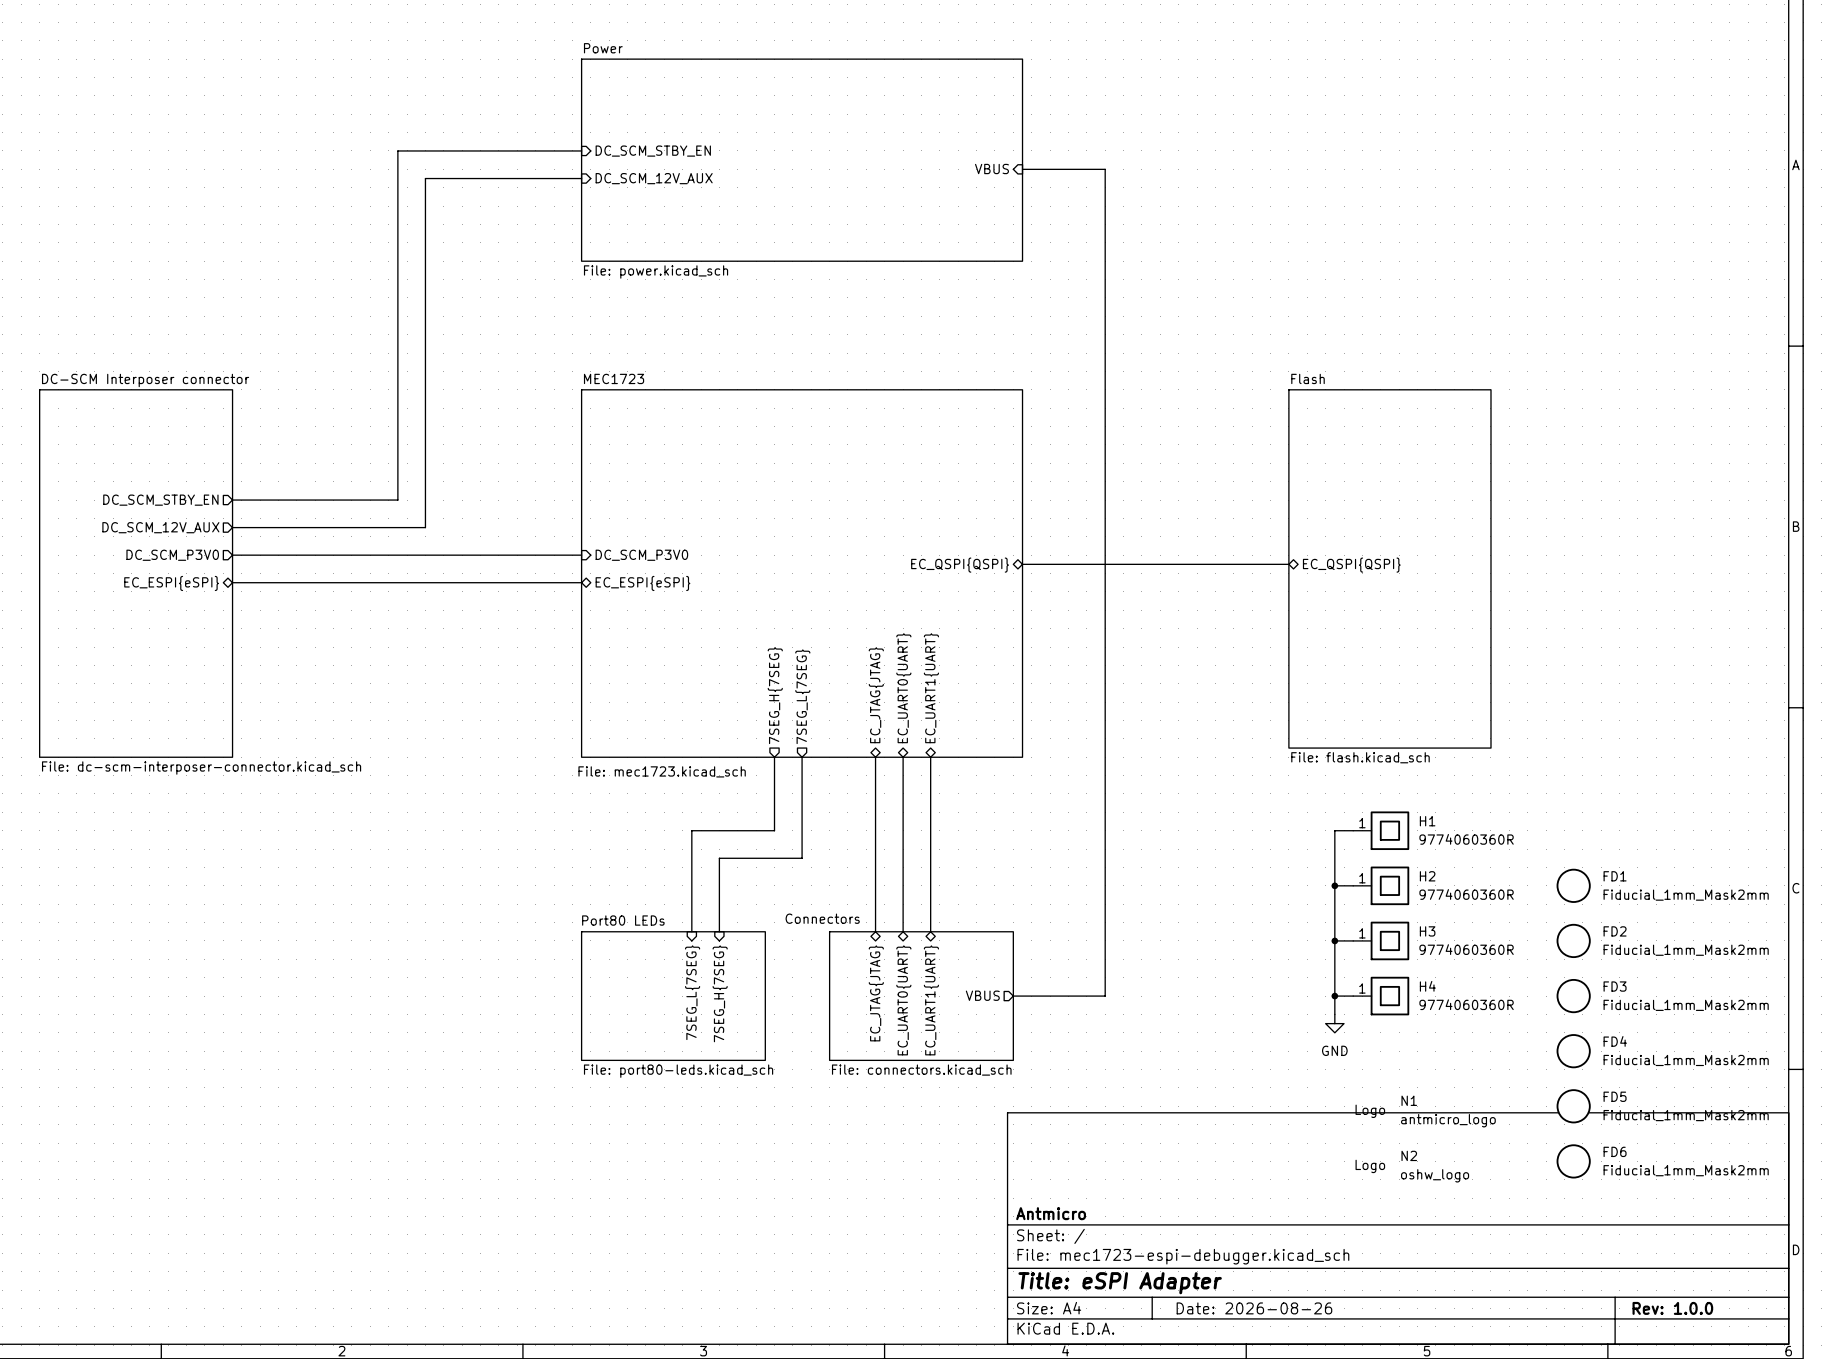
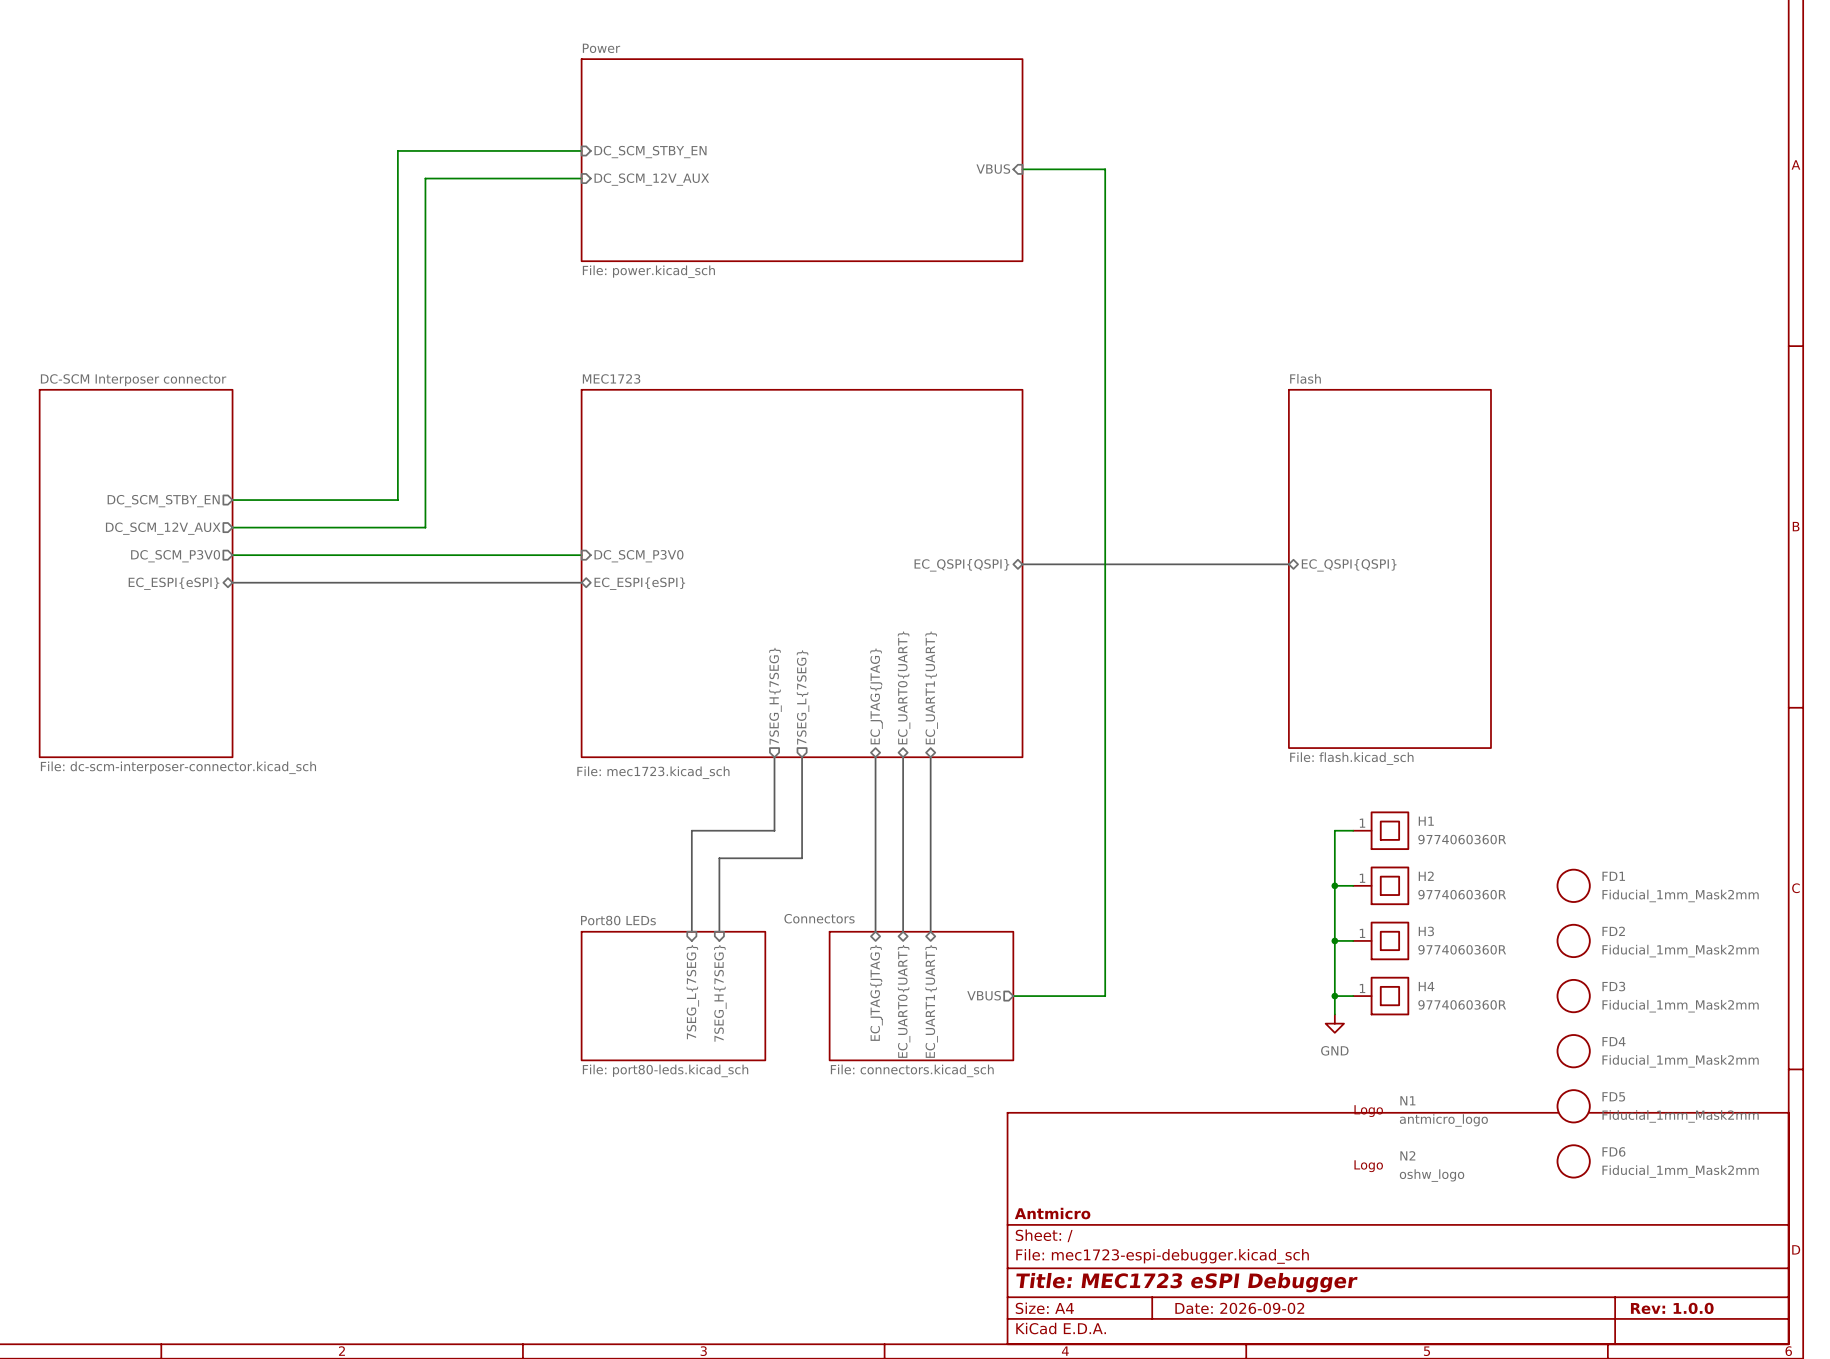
title block: Title: eSPI Adapter (1120, 1283) -> Title: MEC1723 eSPI Debugger (1186, 1282)
title block: Date: 2026-08-26 (1254, 1308) -> Date: 2026-09-02 (1239, 1308)

